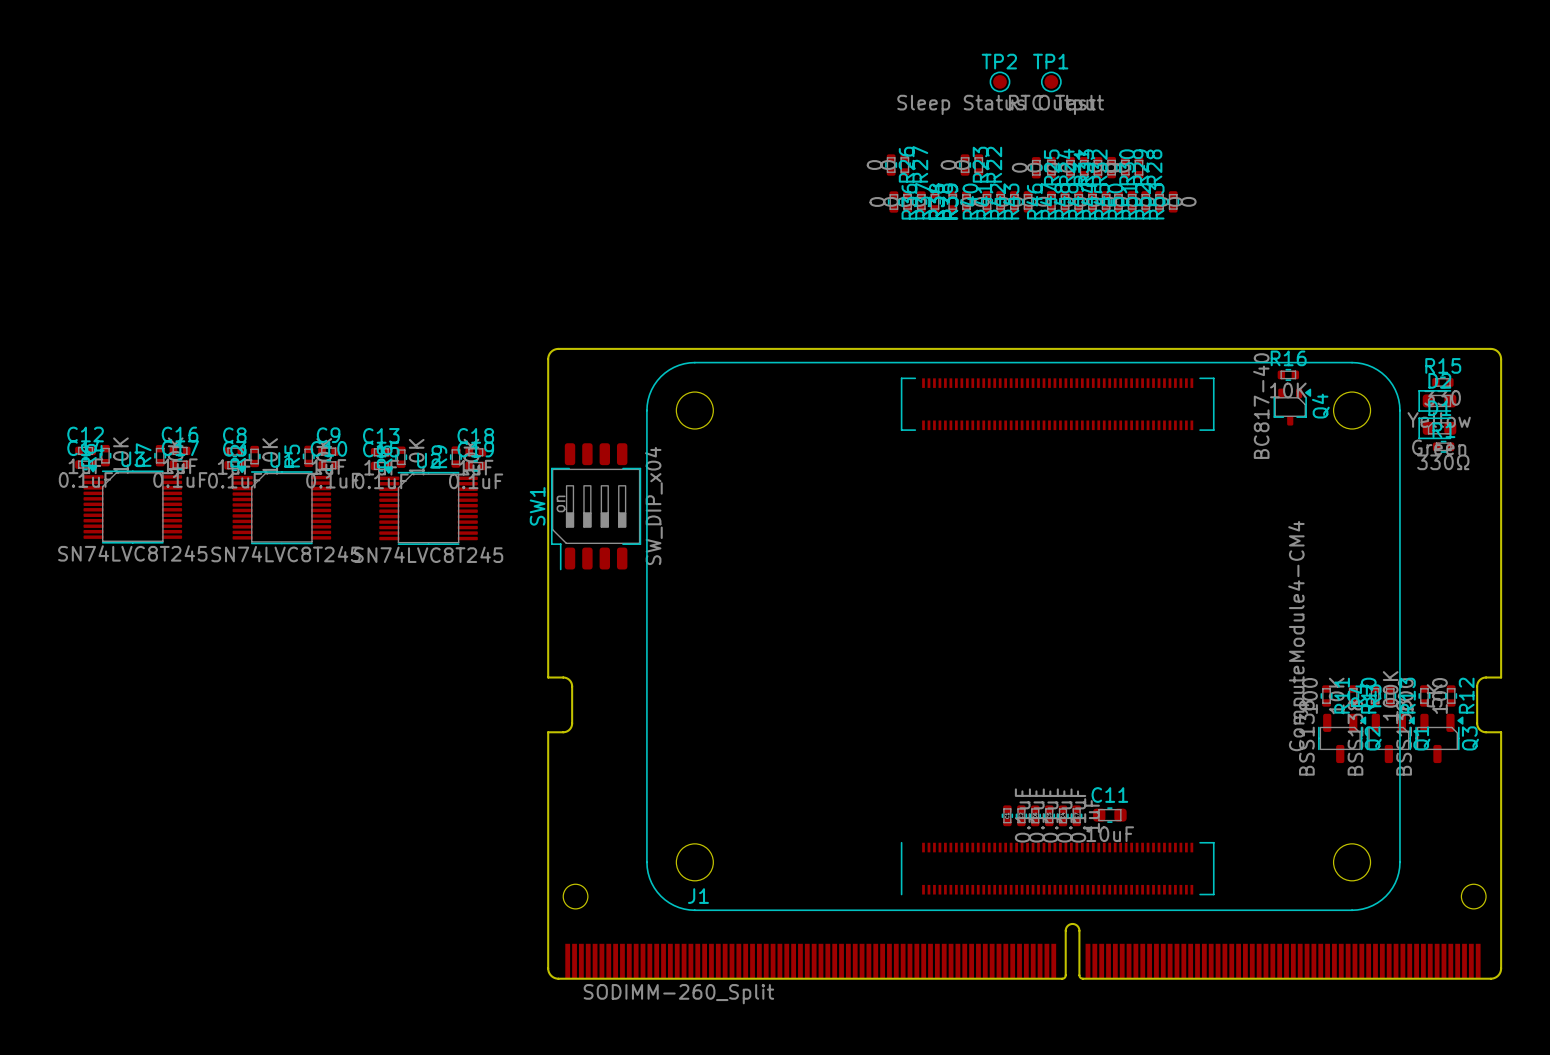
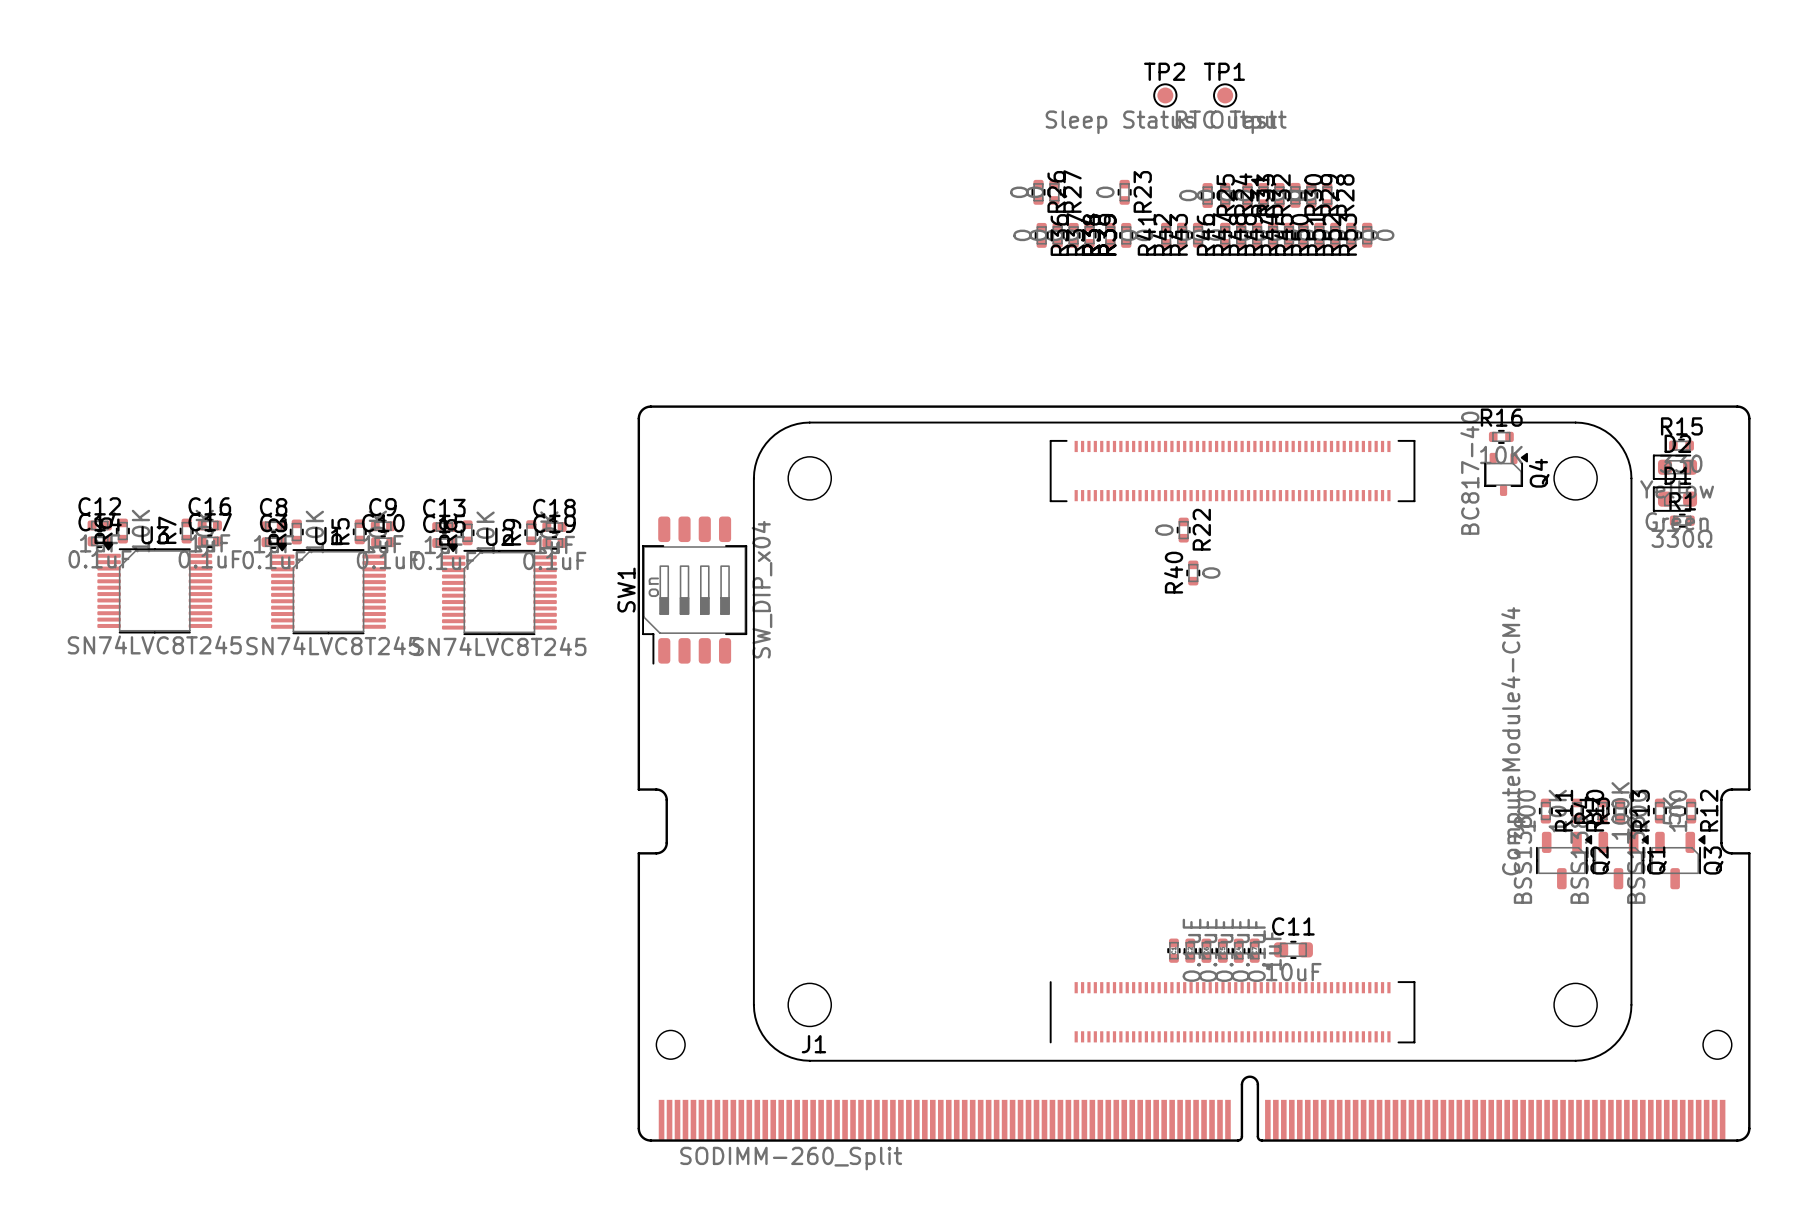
R22 position: (978, 165) -> (1183, 530)
R40 position: (986, 201) -> (1193, 573)

